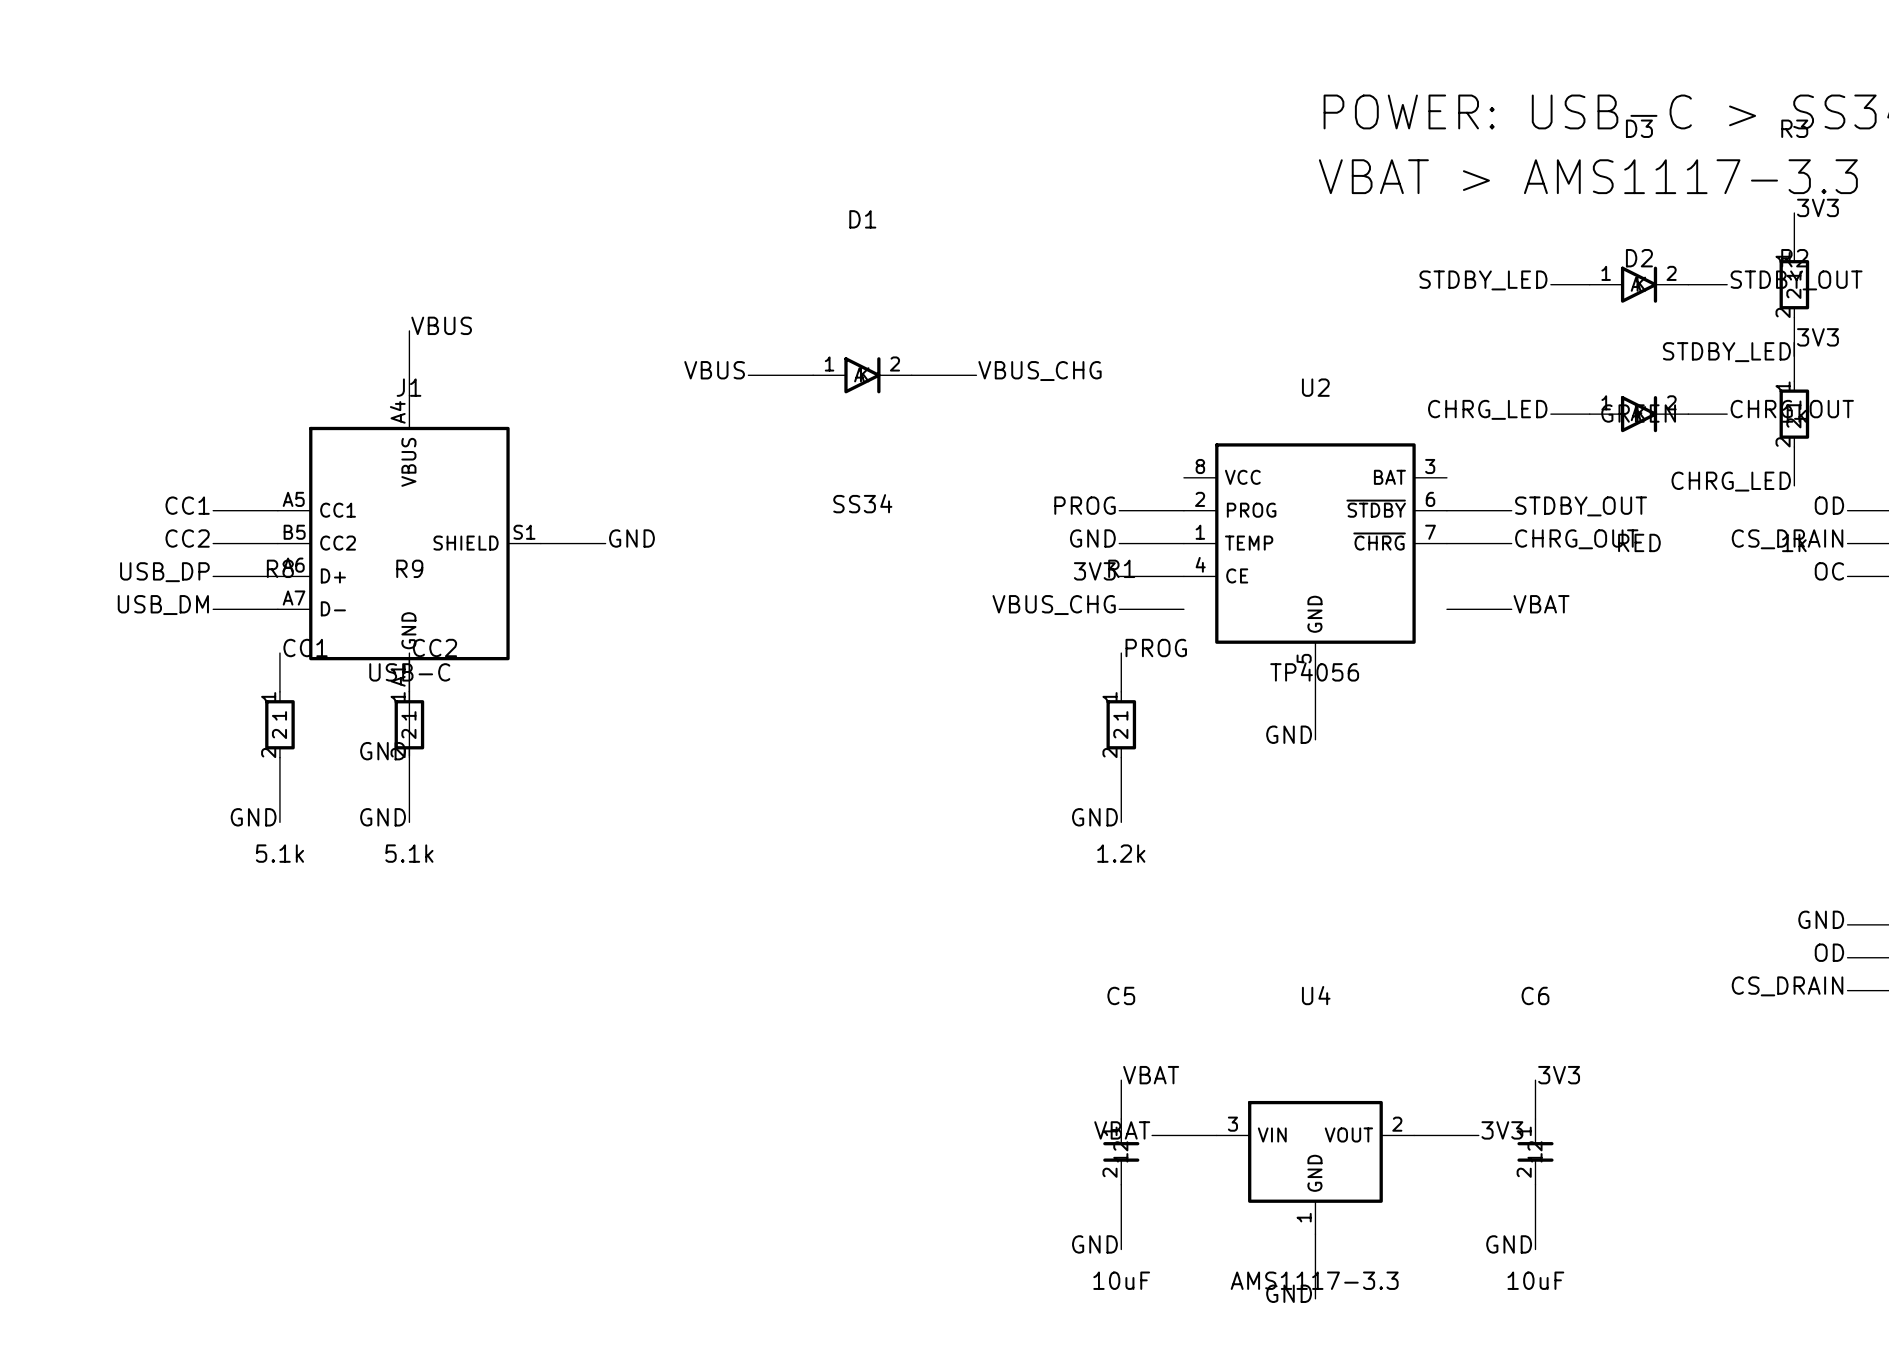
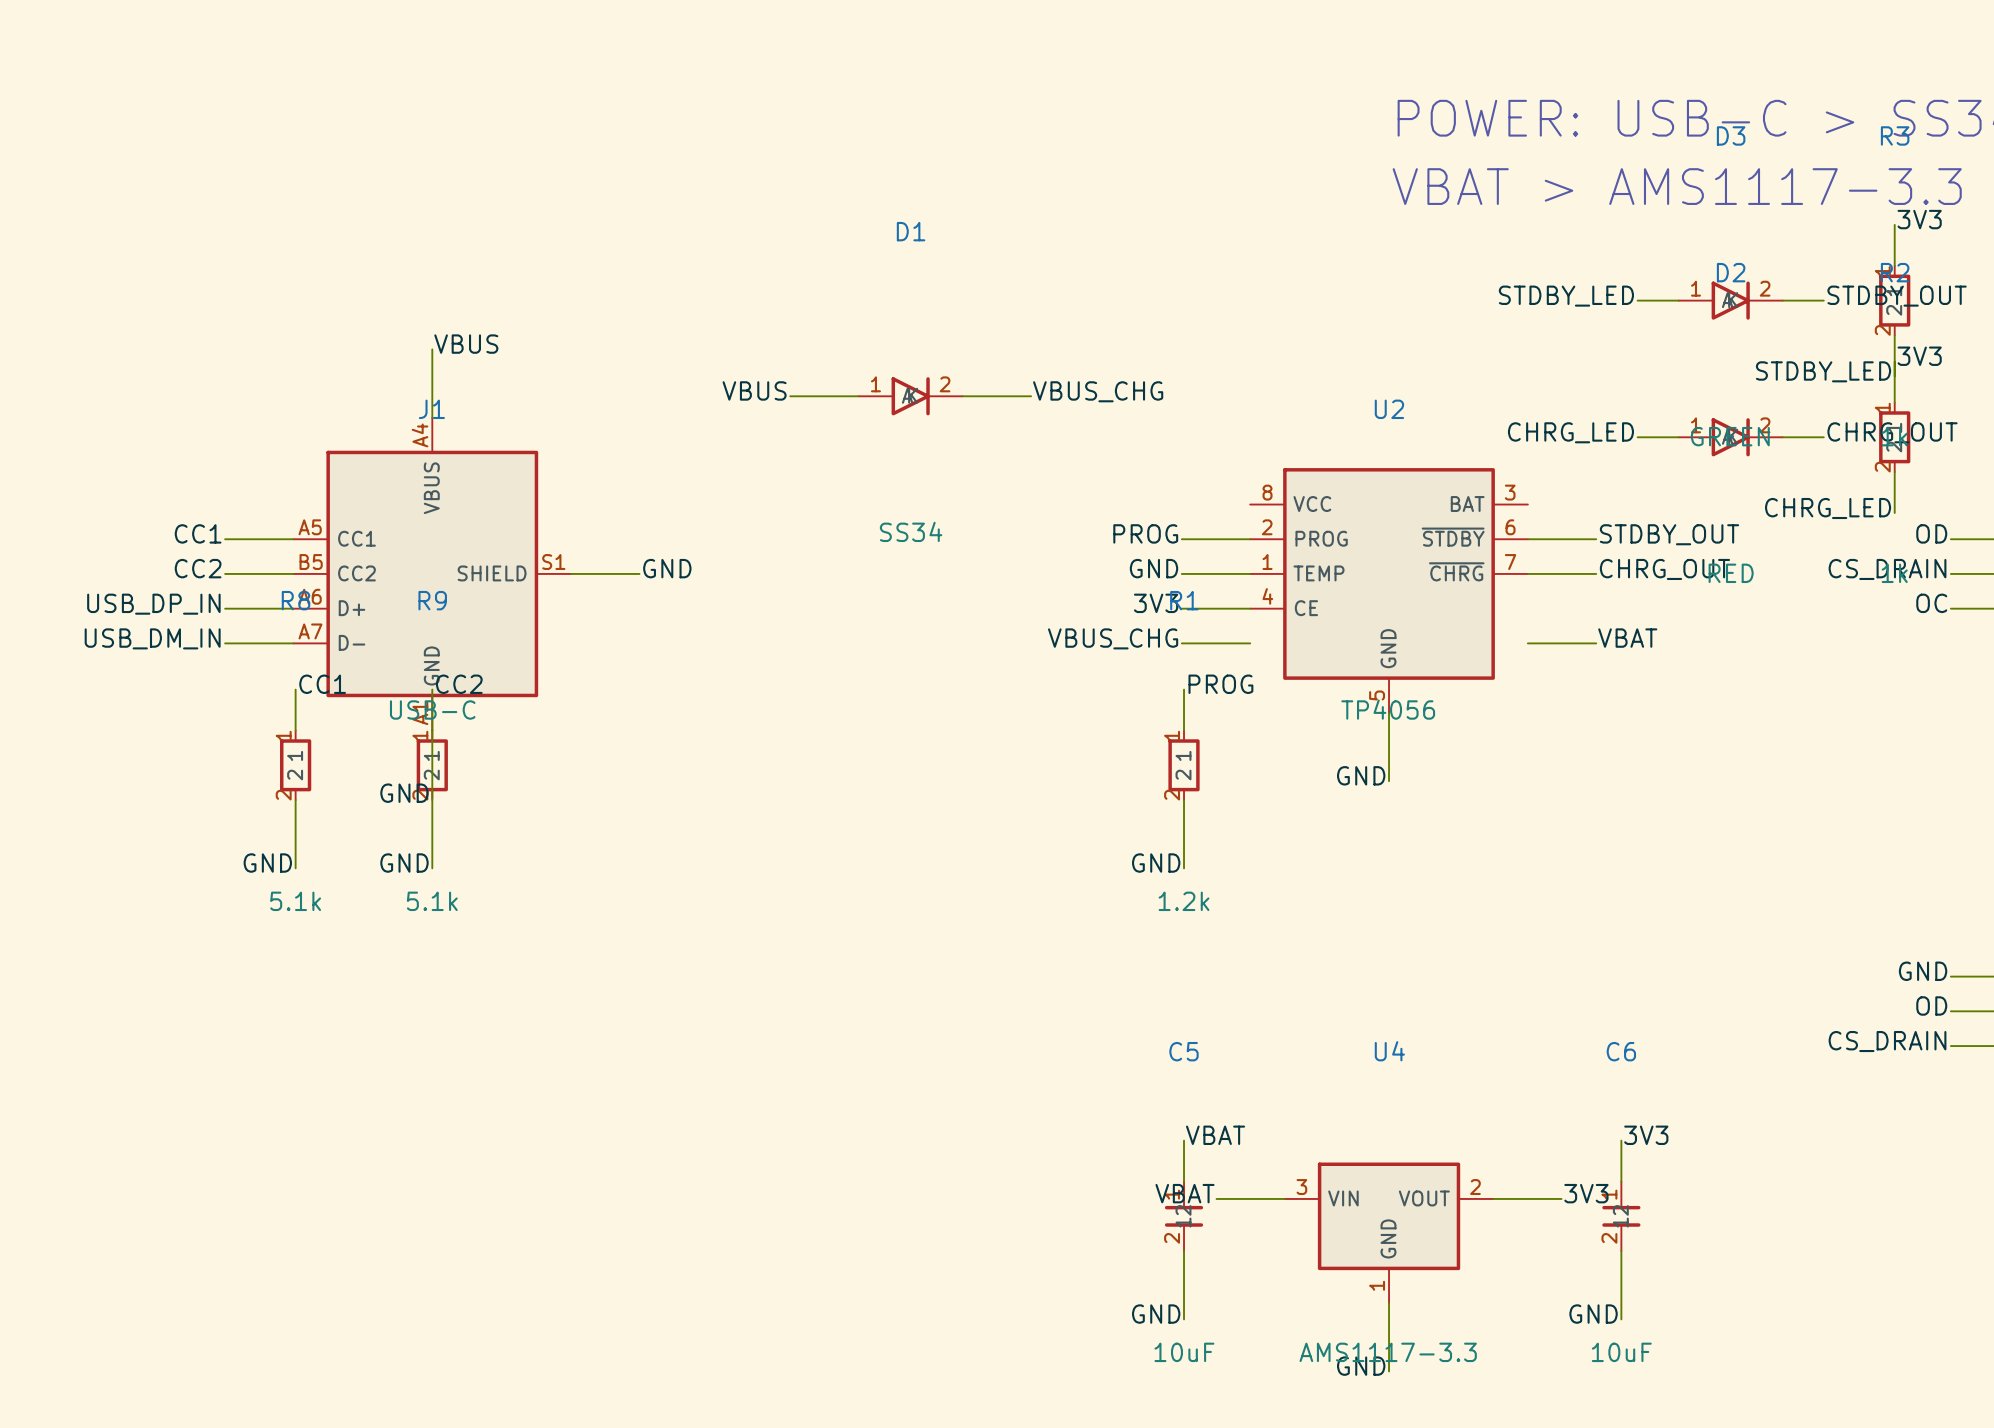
label: USB_DP (164, 572) -> USB_DP_IN (153, 604)
label: USB_DM (163, 605) -> USB_DM_IN (152, 638)

